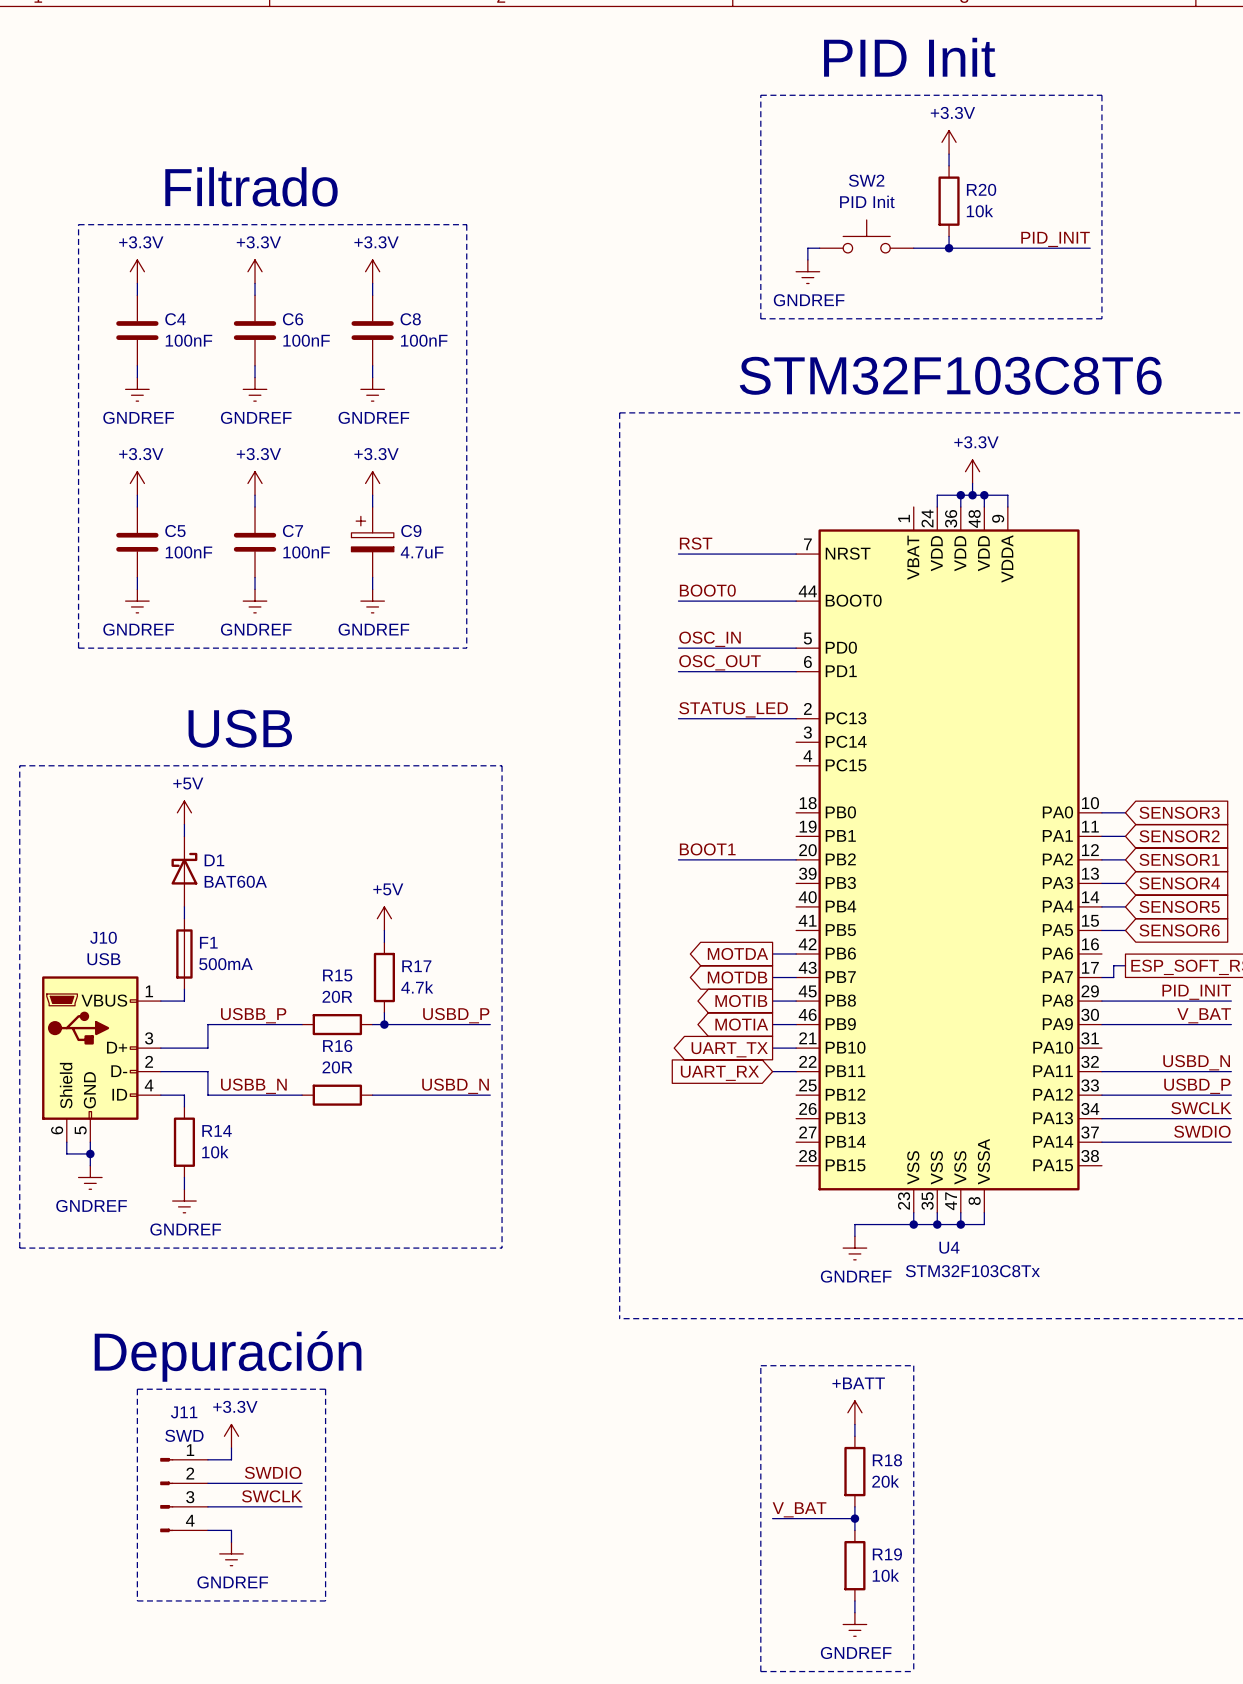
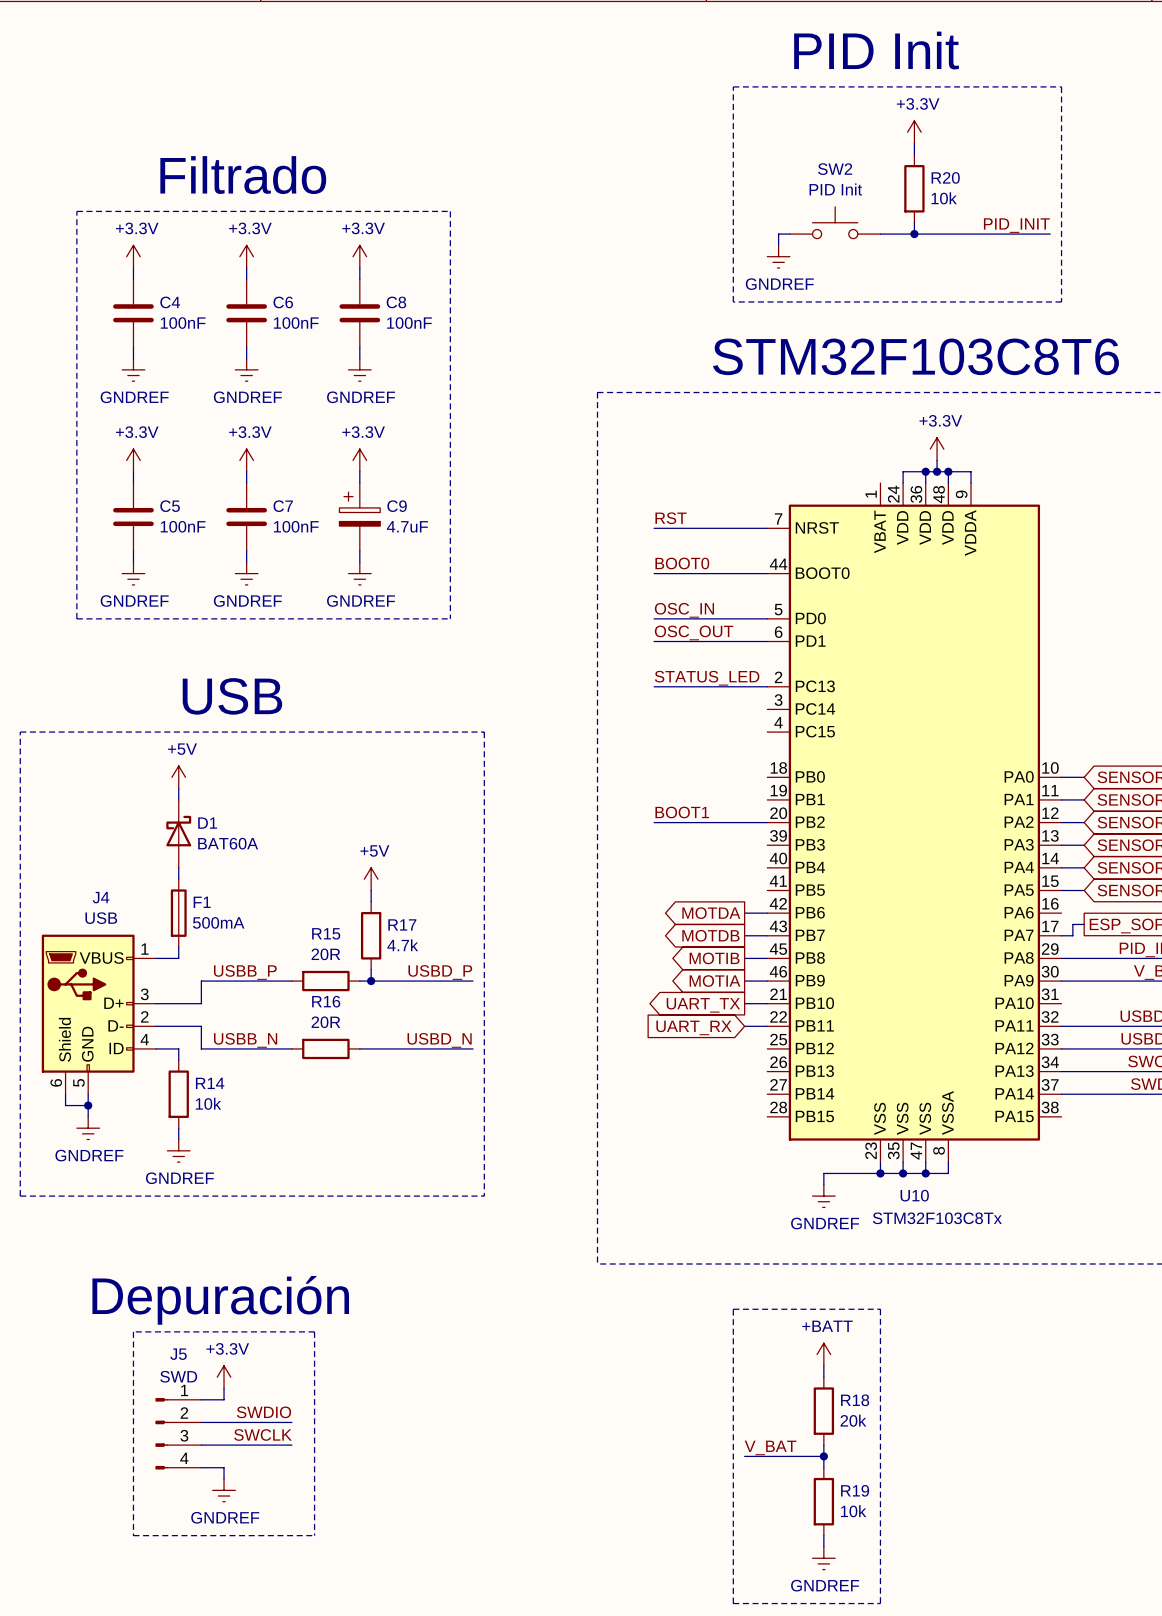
J10 name: J10 (103, 937) -> J4 (100, 897)
U4 name: U4 (949, 1247) -> U10 (914, 1195)
J11 name: J11 (184, 1412) -> J5 (178, 1354)

